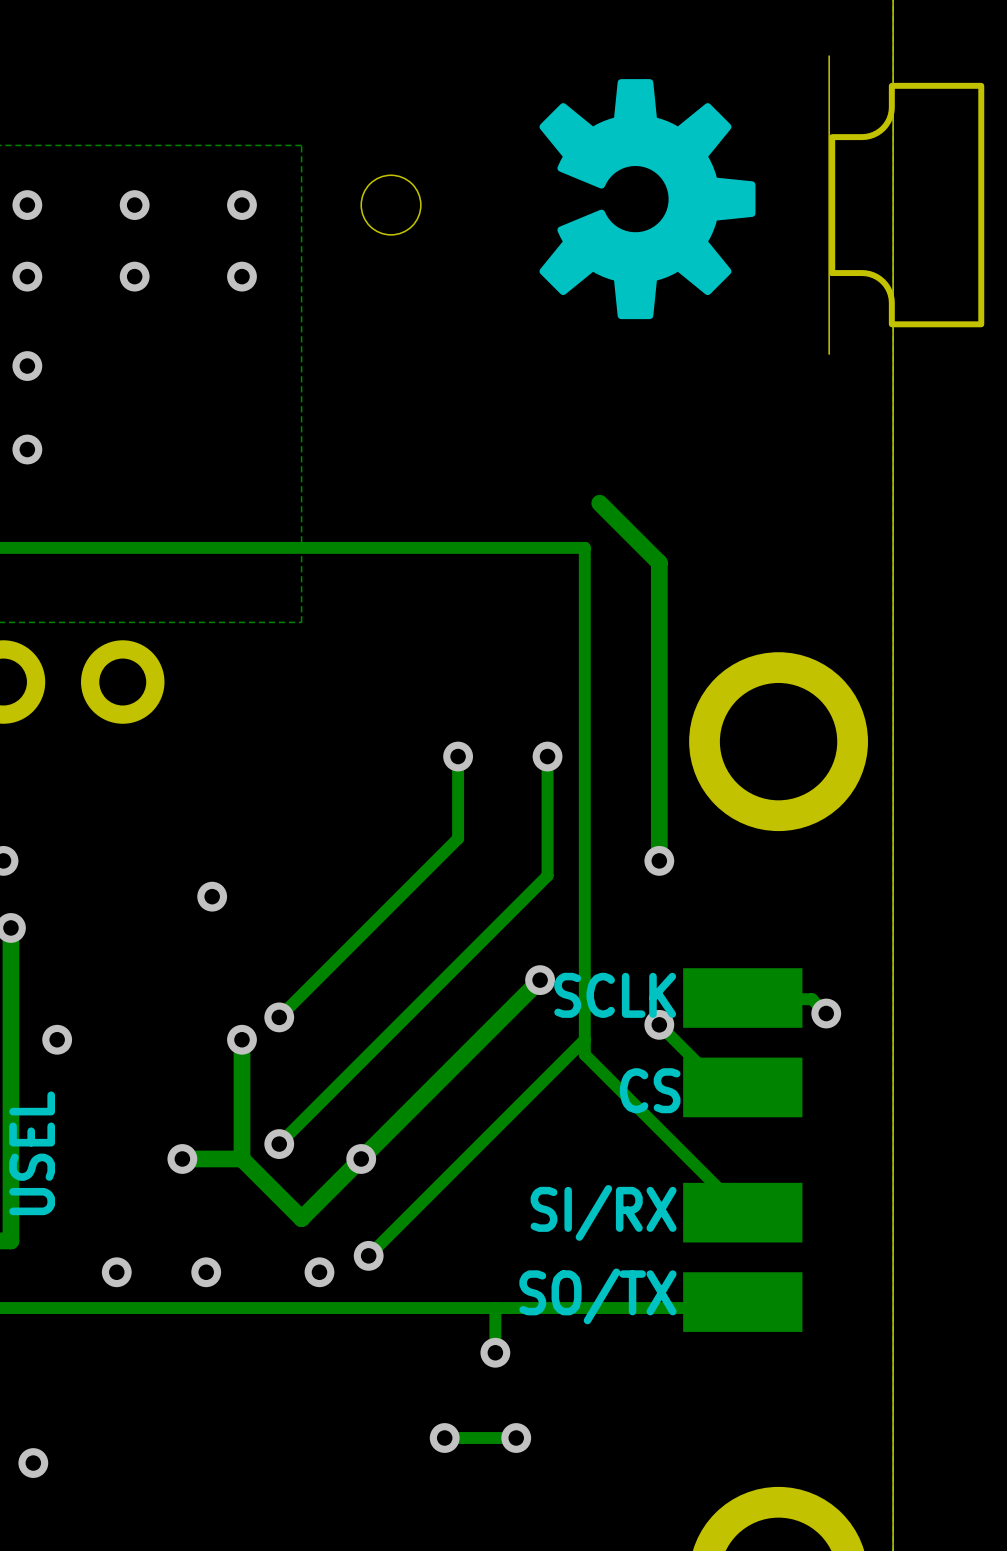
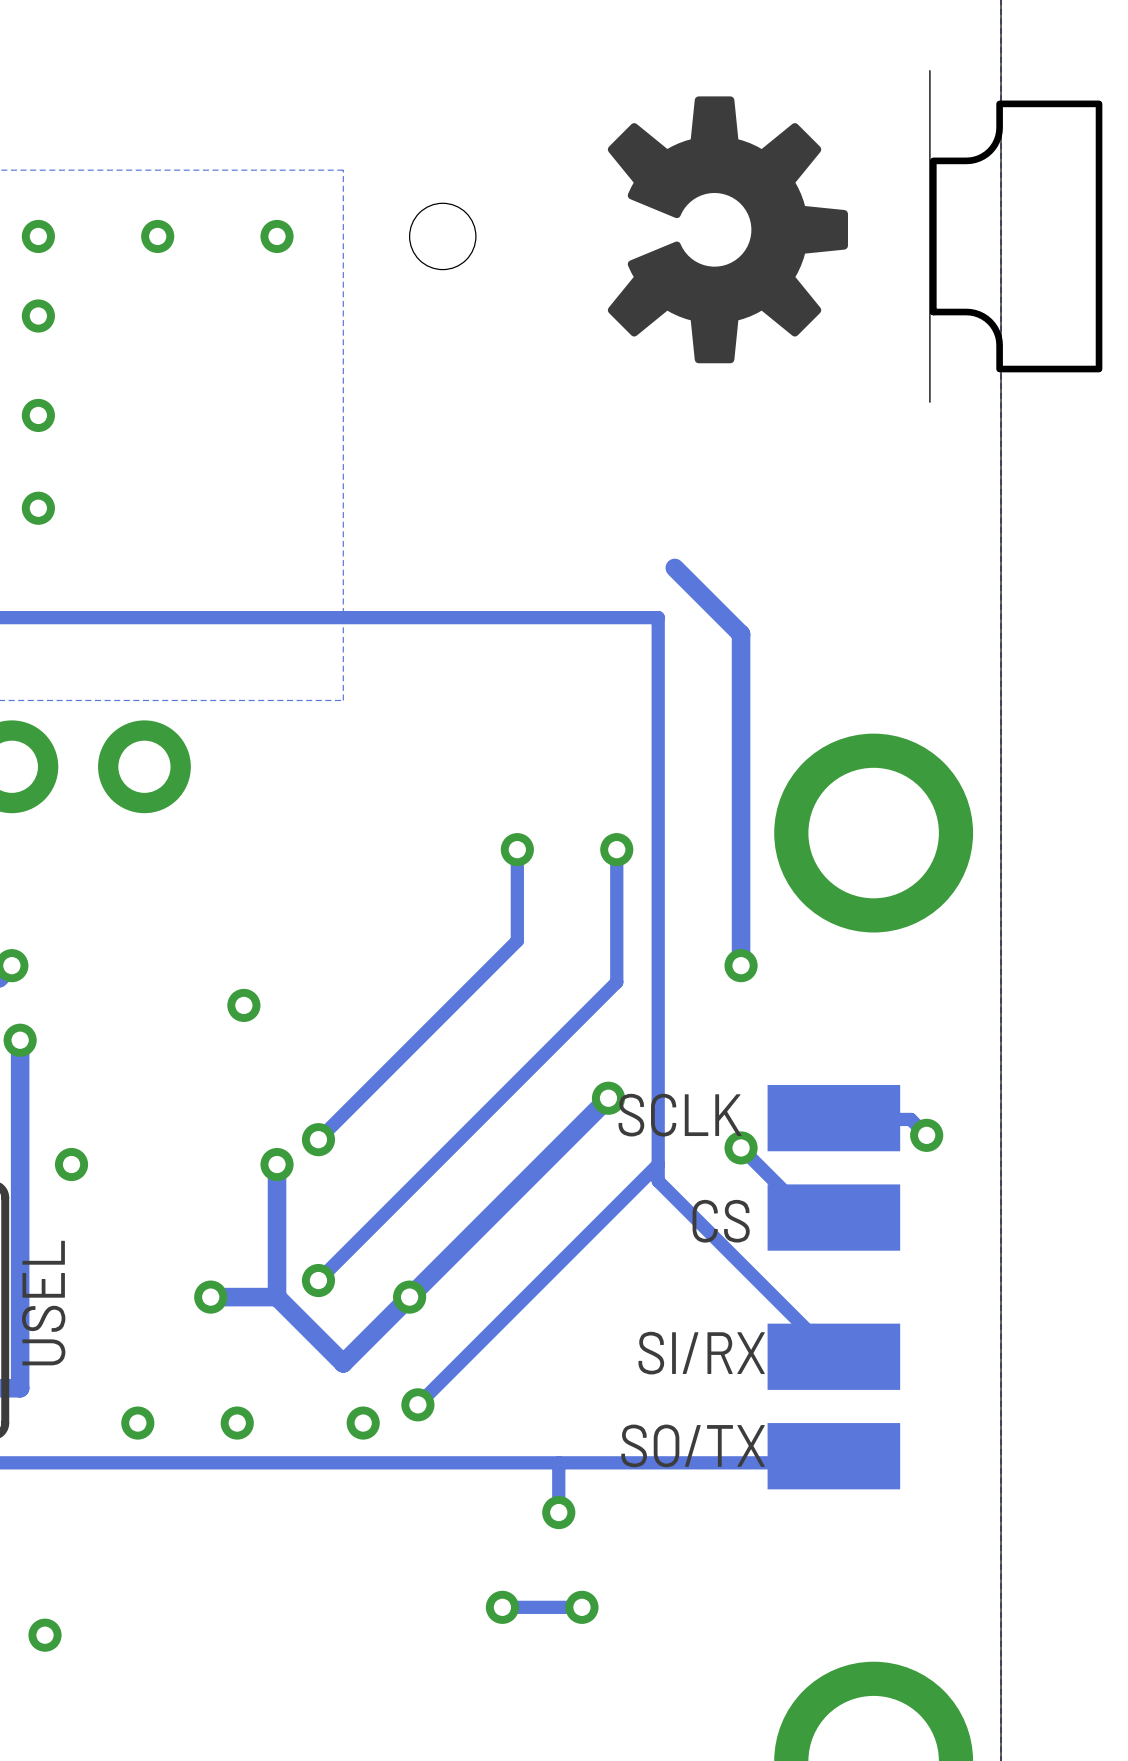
via: (134, 276) -> none
via: (241, 276) -> none

